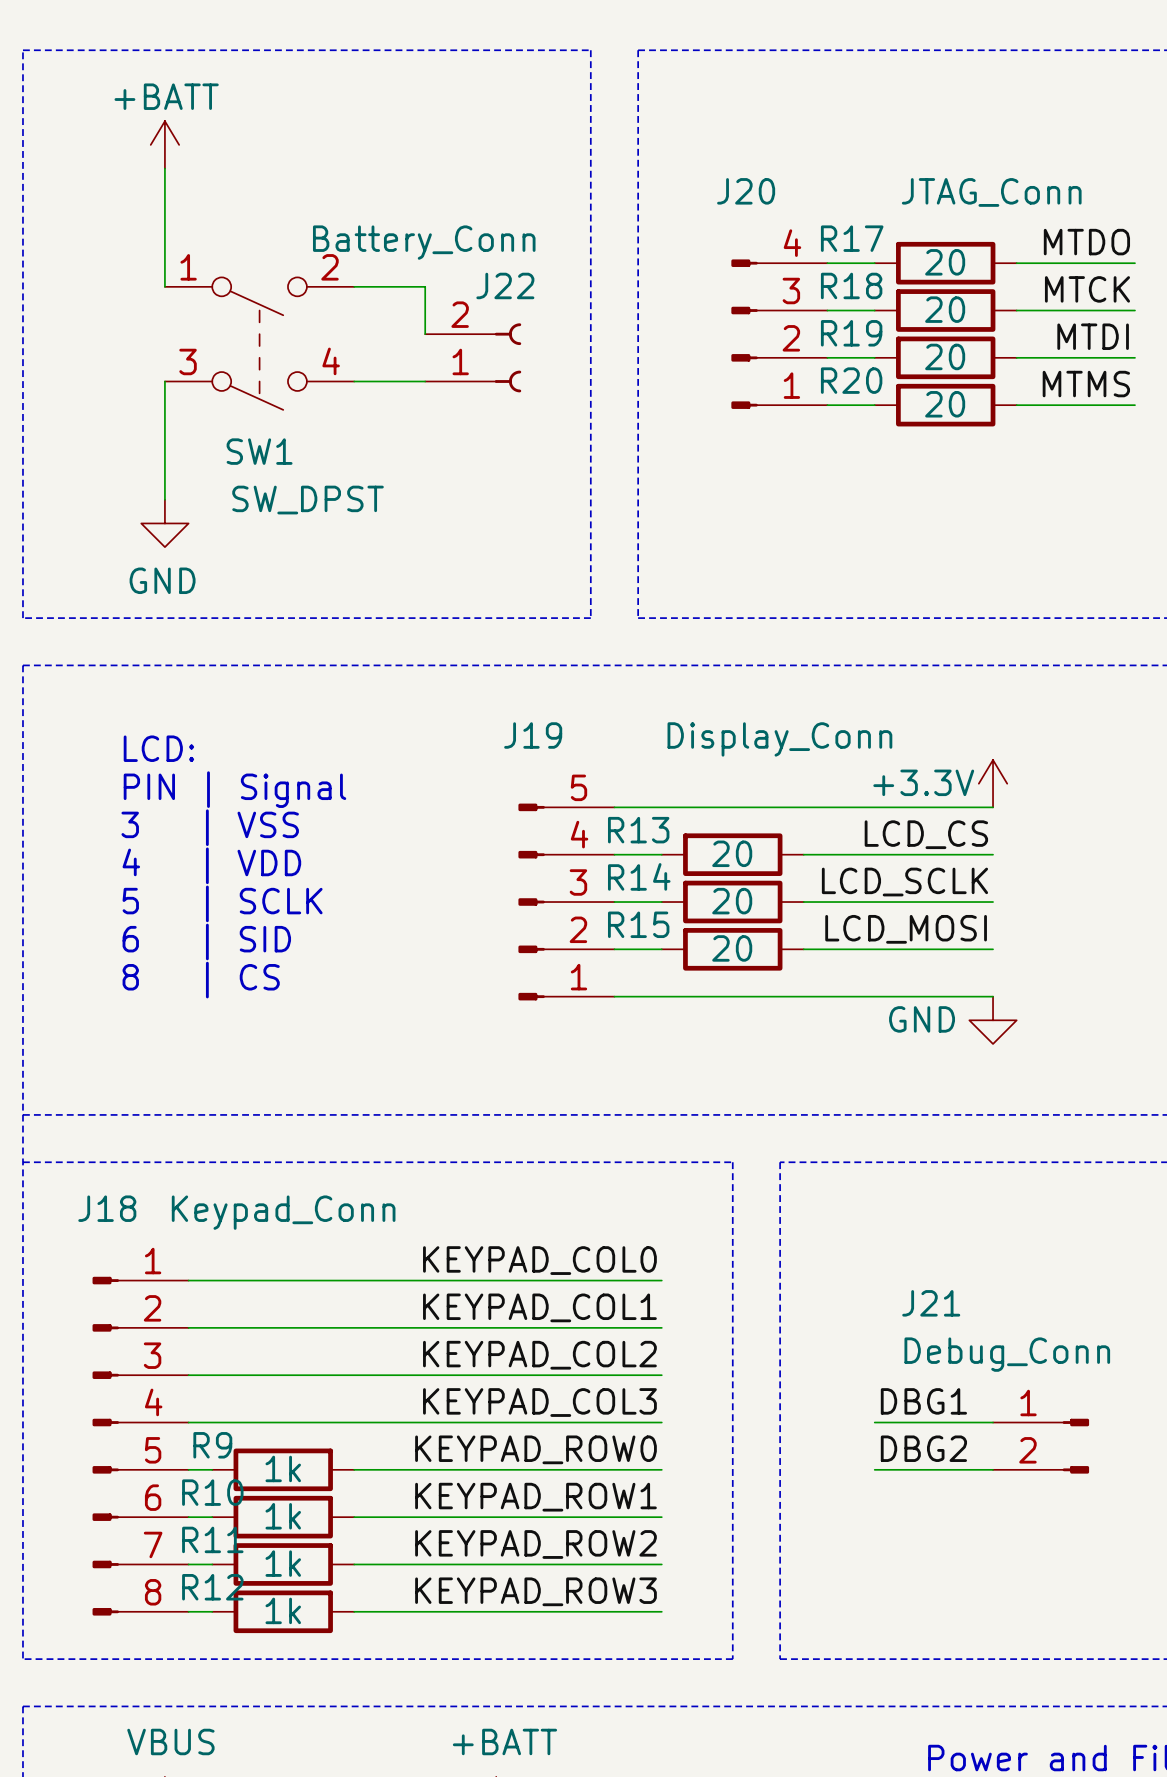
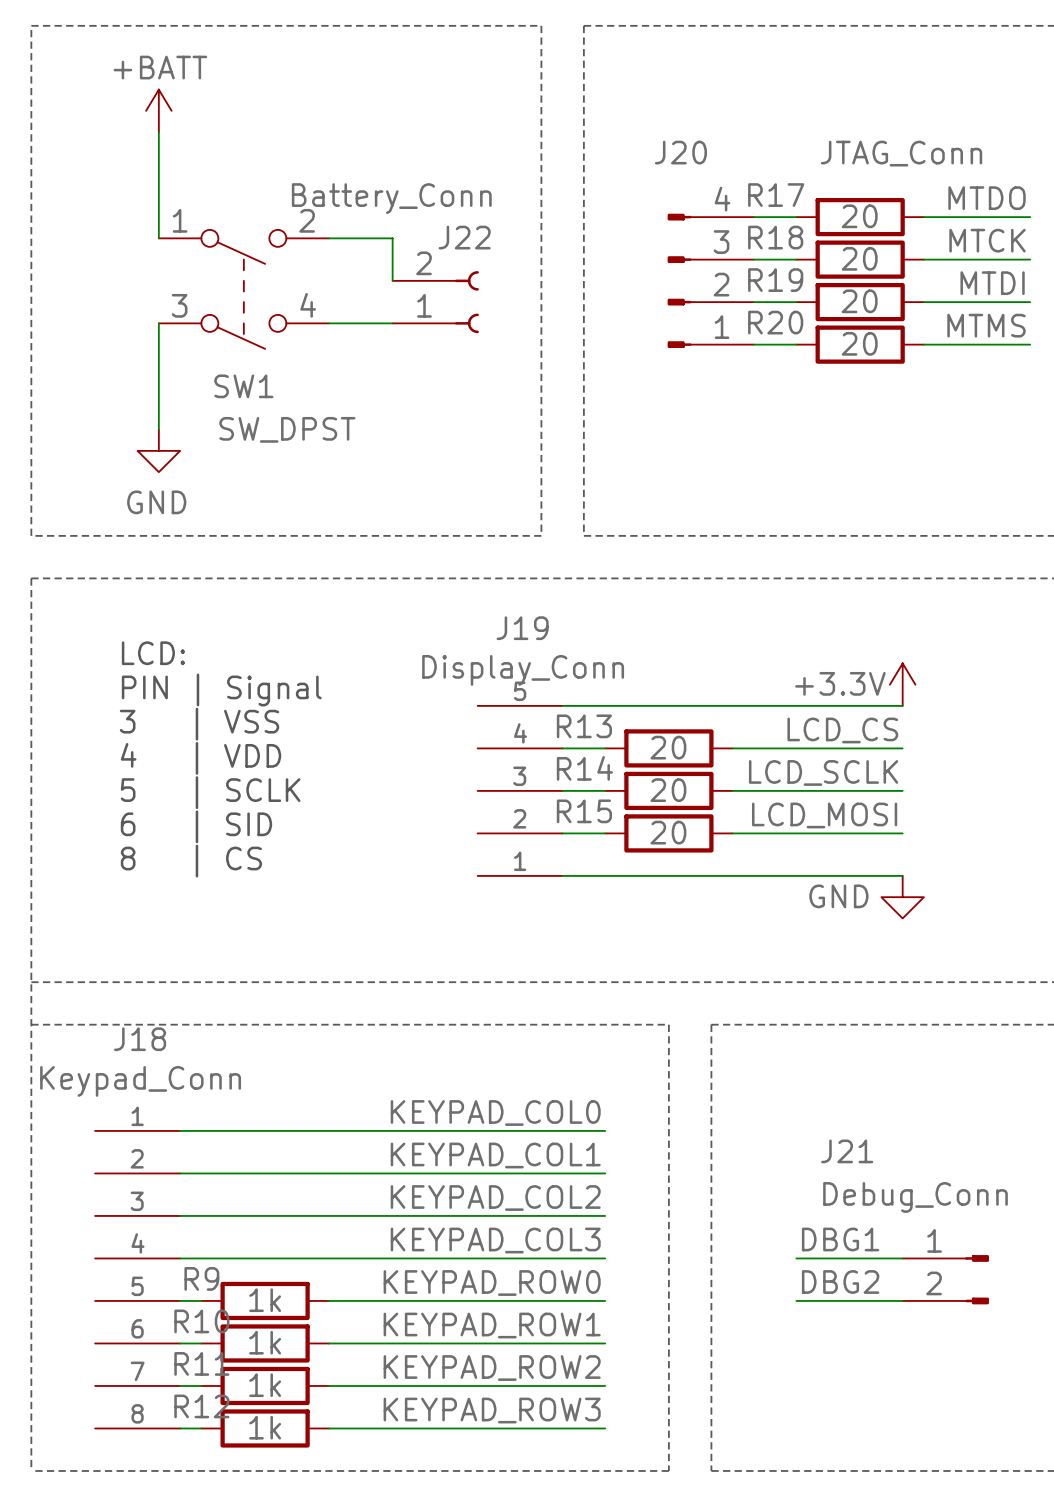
J19 name position: J19 (533, 735) -> J19 (522, 628)
J19 value position: Display_Conn (779, 739) -> Display_Conn (523, 670)
J19 symbol: [518, 803, 615, 1001] -> [477, 705, 563, 876]
J18 name position: J18 (107, 1208) -> J18 (140, 1039)
J18 value position: Keypad_Conn (283, 1212) -> Keypad_Conn (140, 1081)
J18 symbol: [92, 1276, 189, 1616] -> [95, 1130, 181, 1429]

